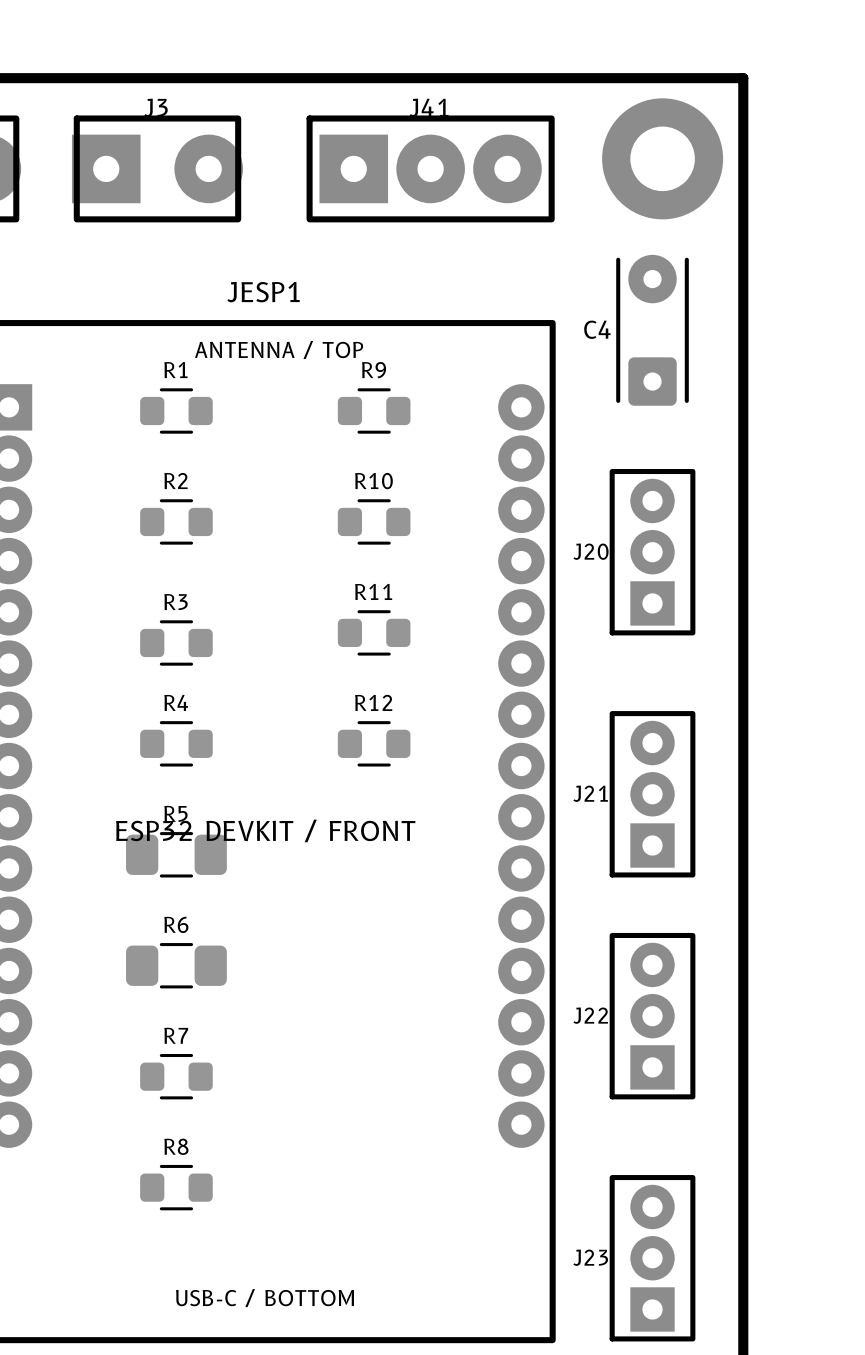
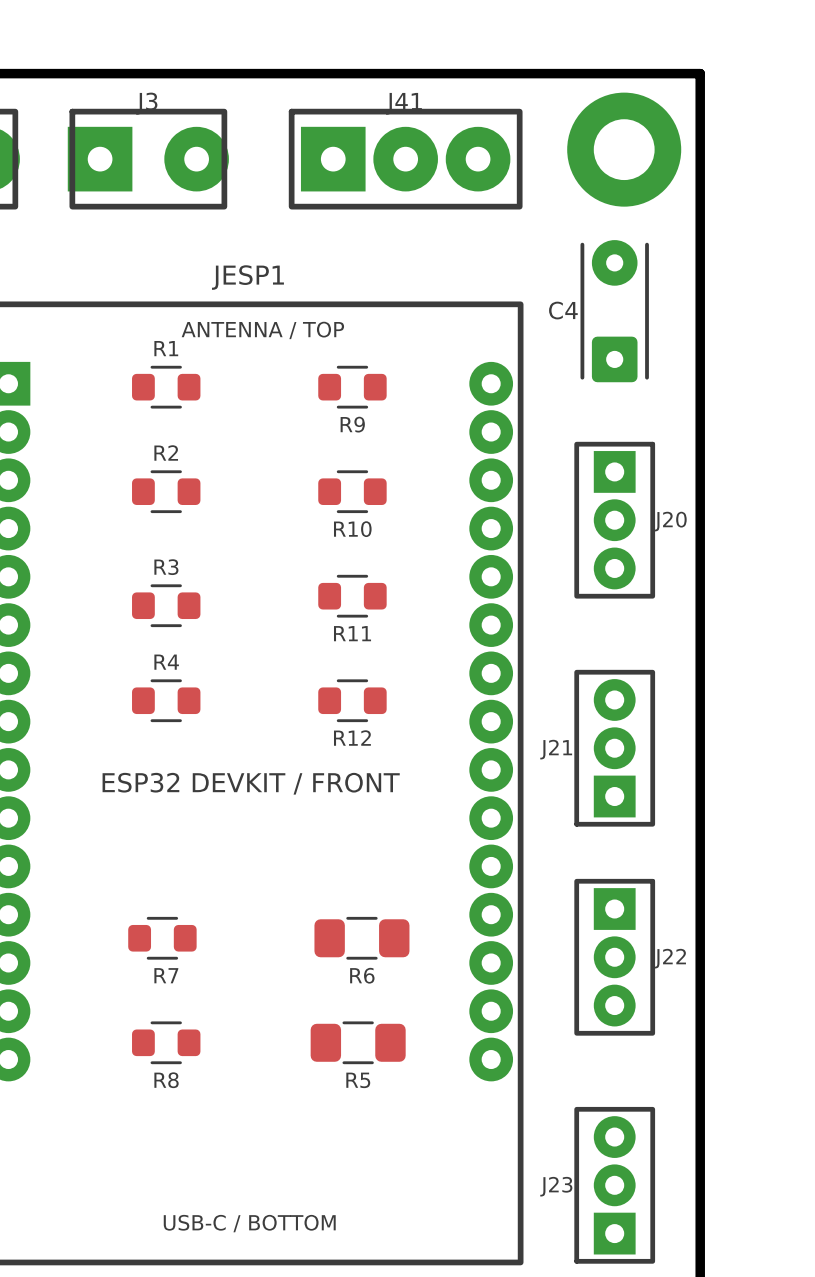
R9 name position: R9 (374, 370) -> R9 (352, 424)
R10 name position: R10 (373, 481) -> R10 (352, 529)
J20 rotation: 0° (652, 552) -> 180° (614, 520)
R11 name position: R11 (373, 591) -> R11 (352, 633)
R12 name position: R12 (373, 702) -> R12 (352, 738)
R5 name position: R5 (175, 813) -> R5 (358, 1080)
R5 position: (176, 854) -> (358, 1042)
R6 name position: R6 (176, 924) -> R6 (362, 975)
R6 position: (176, 965) -> (361, 938)
J22 rotation: 0° (652, 1016) -> 180° (614, 957)
R7 position: (176, 1076) -> (162, 938)
R8 position: (176, 1187) -> (166, 1042)

